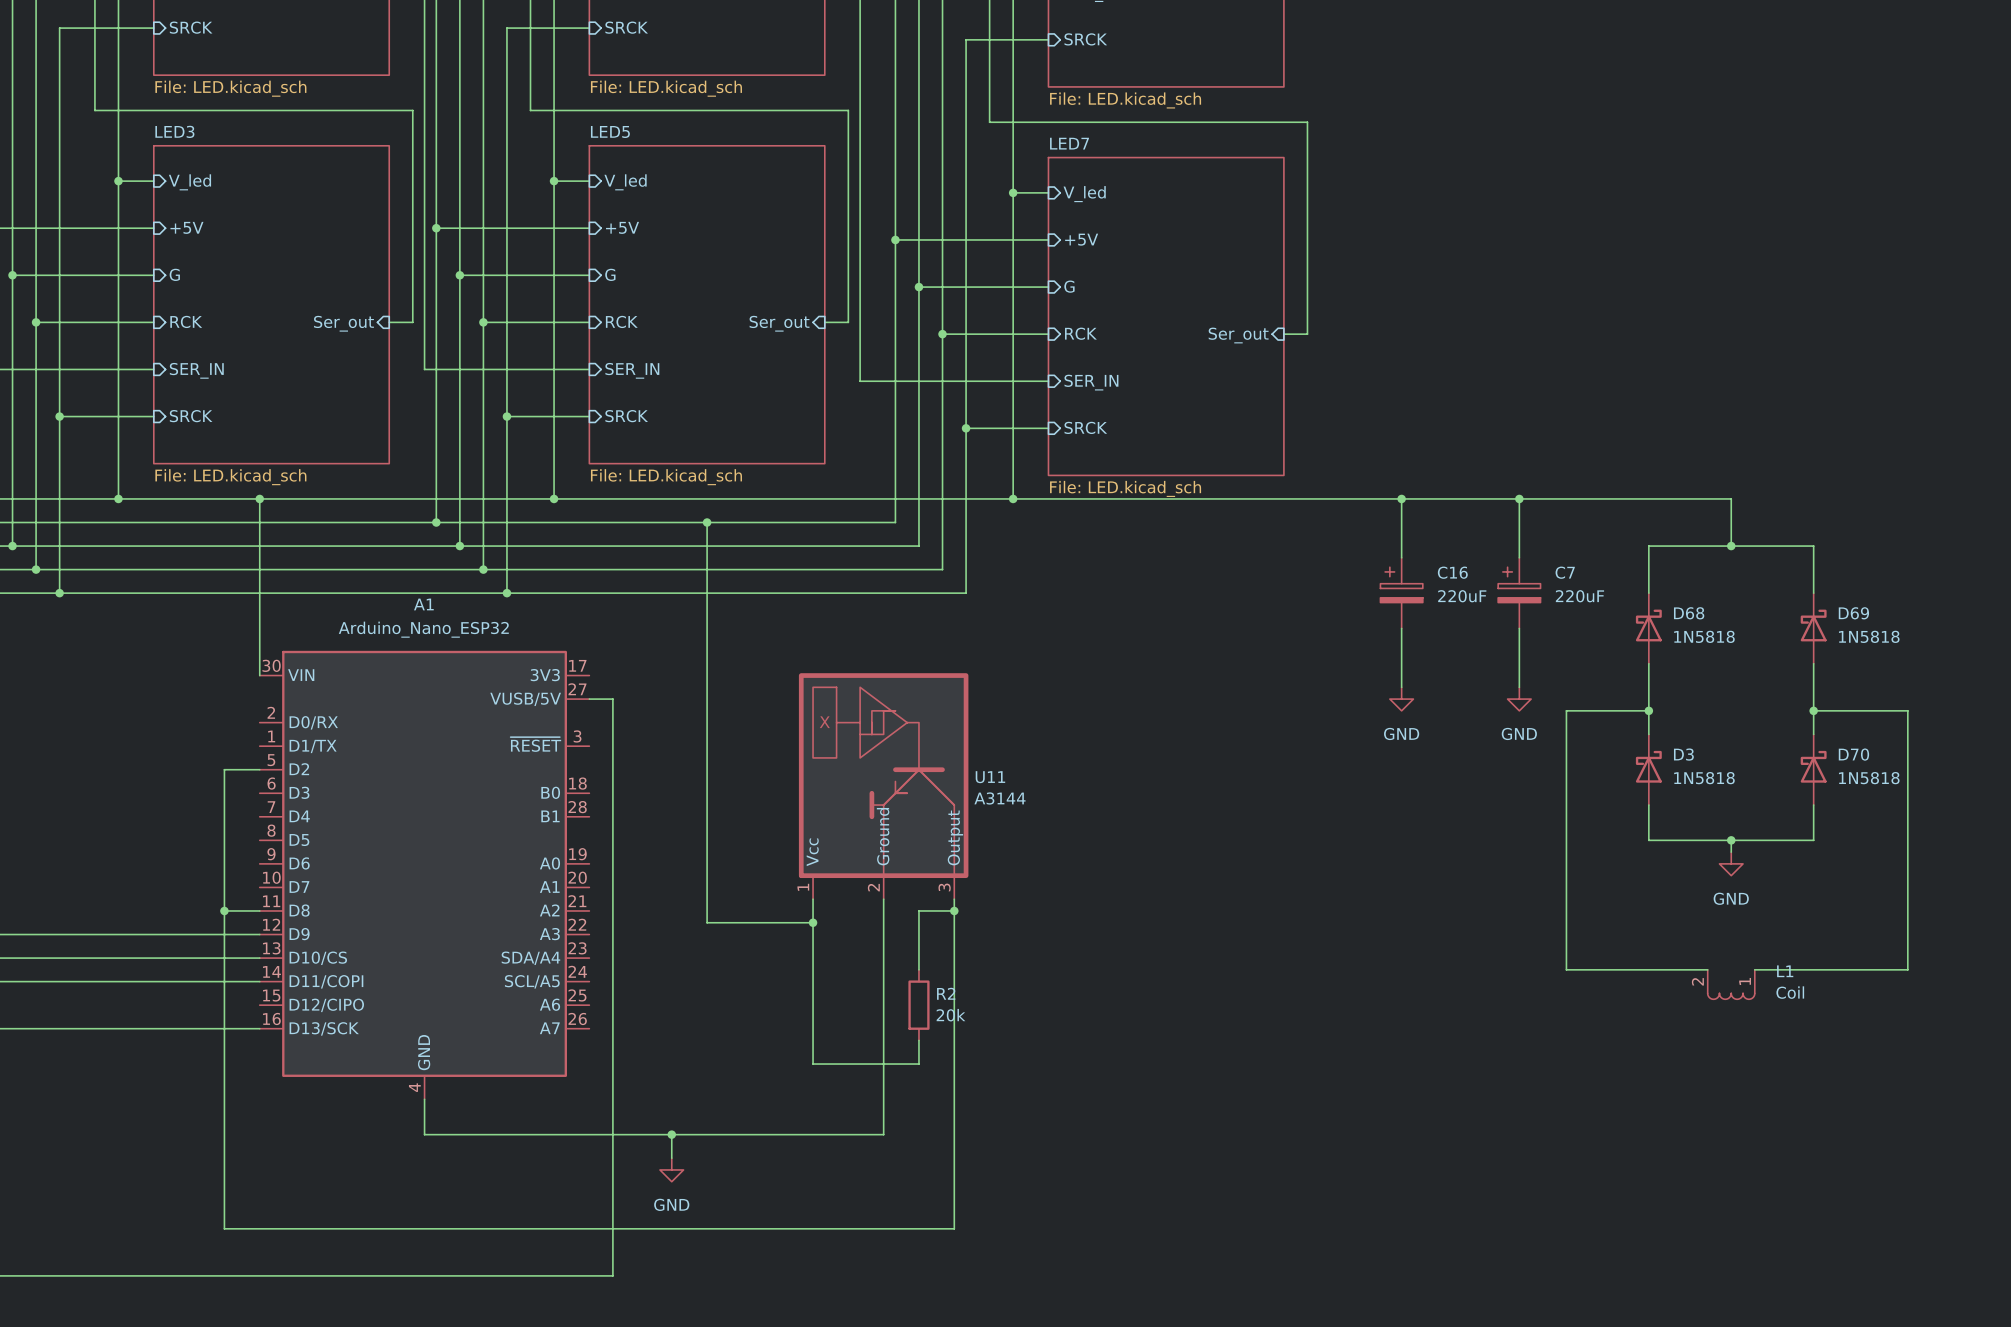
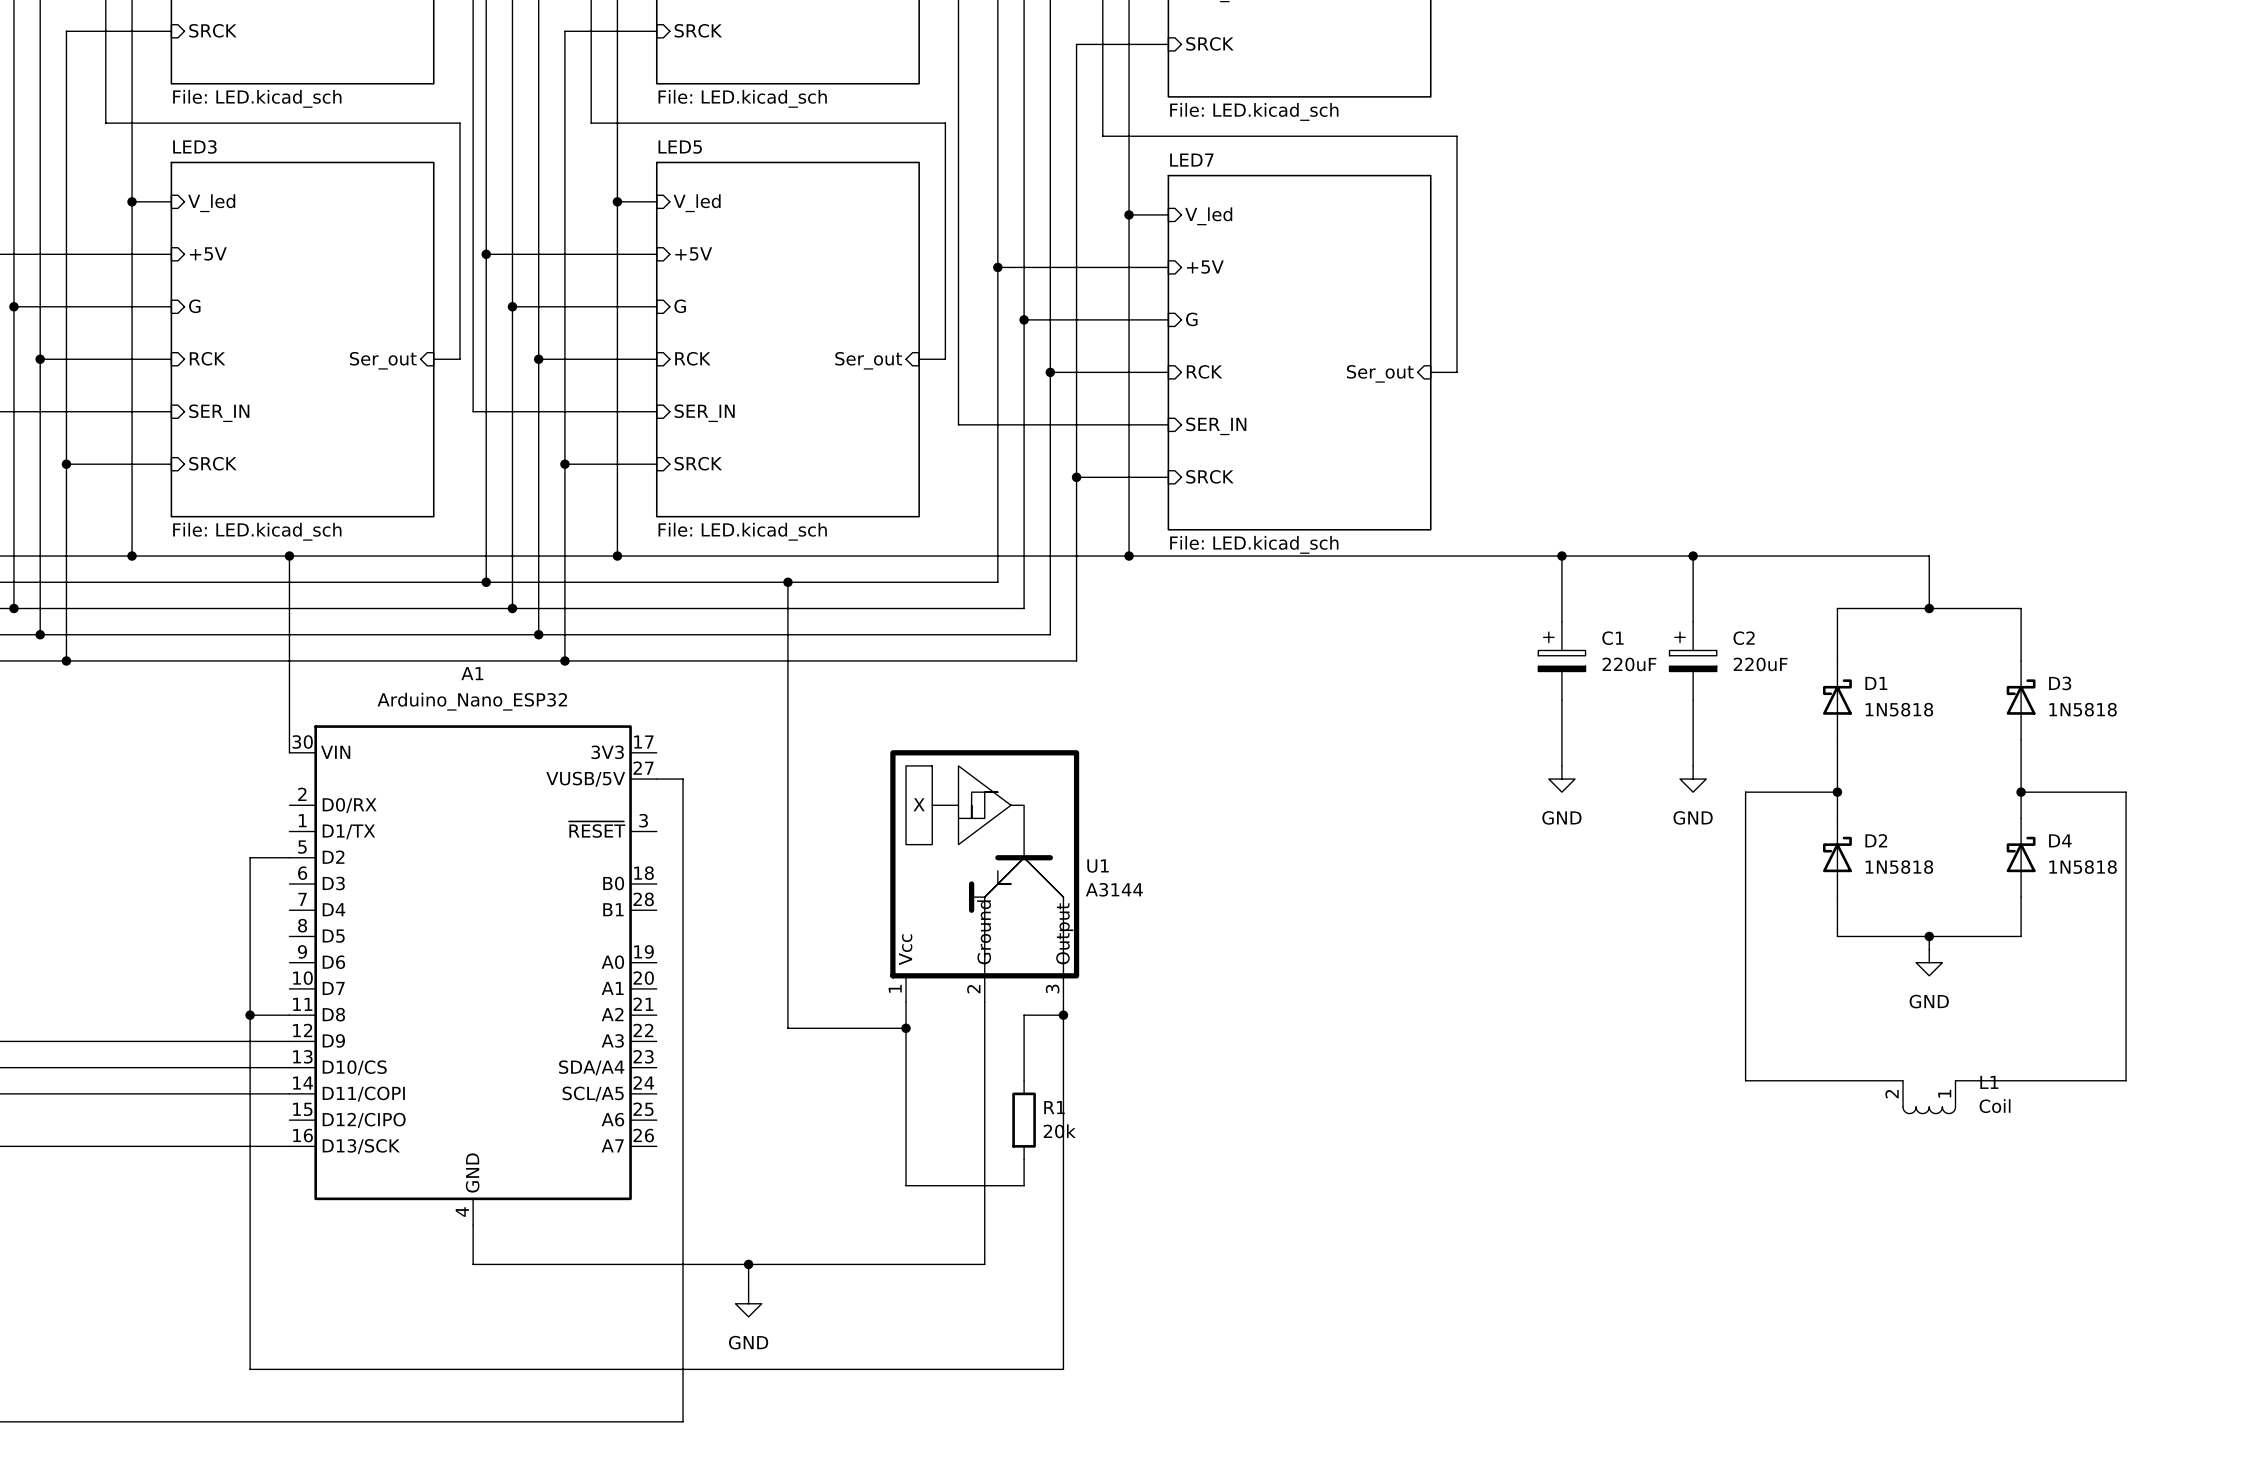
C16 name: C16 (1452, 572) -> C1 (1612, 638)
C7 name: C7 (1565, 572) -> C2 (1744, 638)
D68 name: D68 (1689, 613) -> D1 (1876, 683)
D69 name: D69 (1853, 613) -> D3 (2060, 683)
D3 name: D3 (1683, 754) -> D2 (1876, 840)
D70 name: D70 (1853, 754) -> D4 (2060, 840)
U11 name: U11 (990, 777) -> U1 (1098, 866)
R2 name: R2 (946, 993) -> R1 (1054, 1107)

